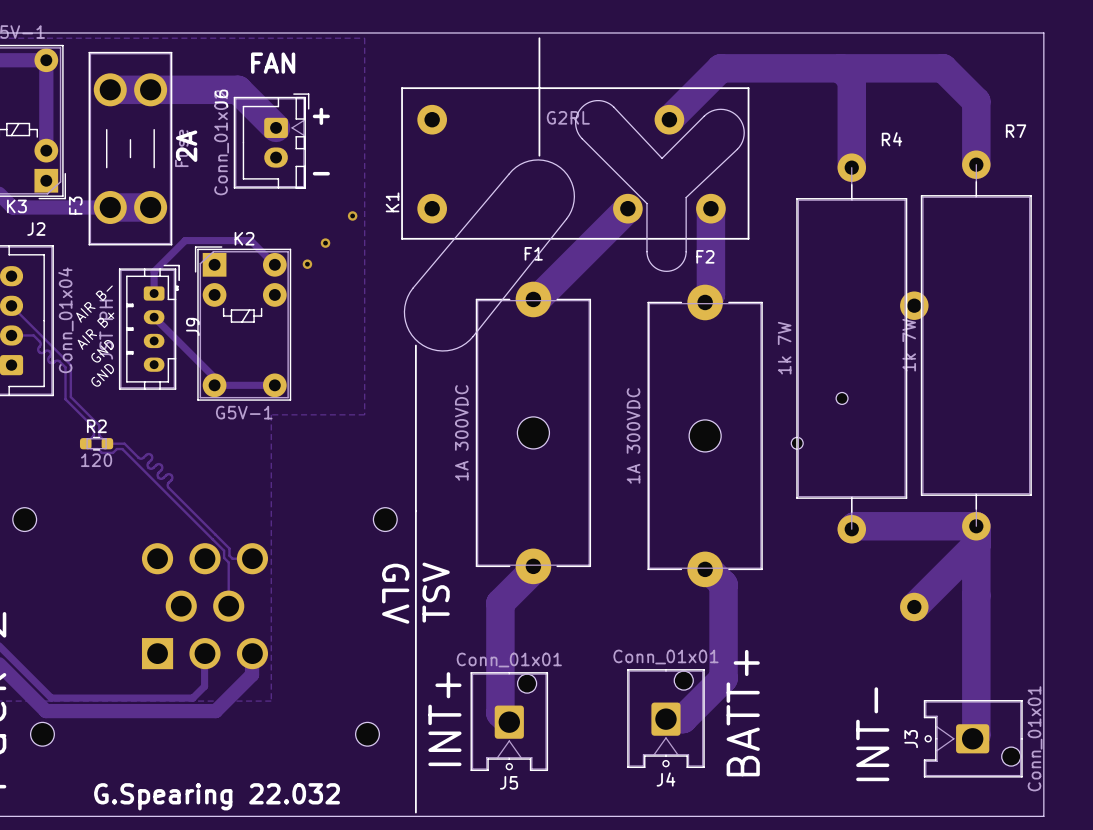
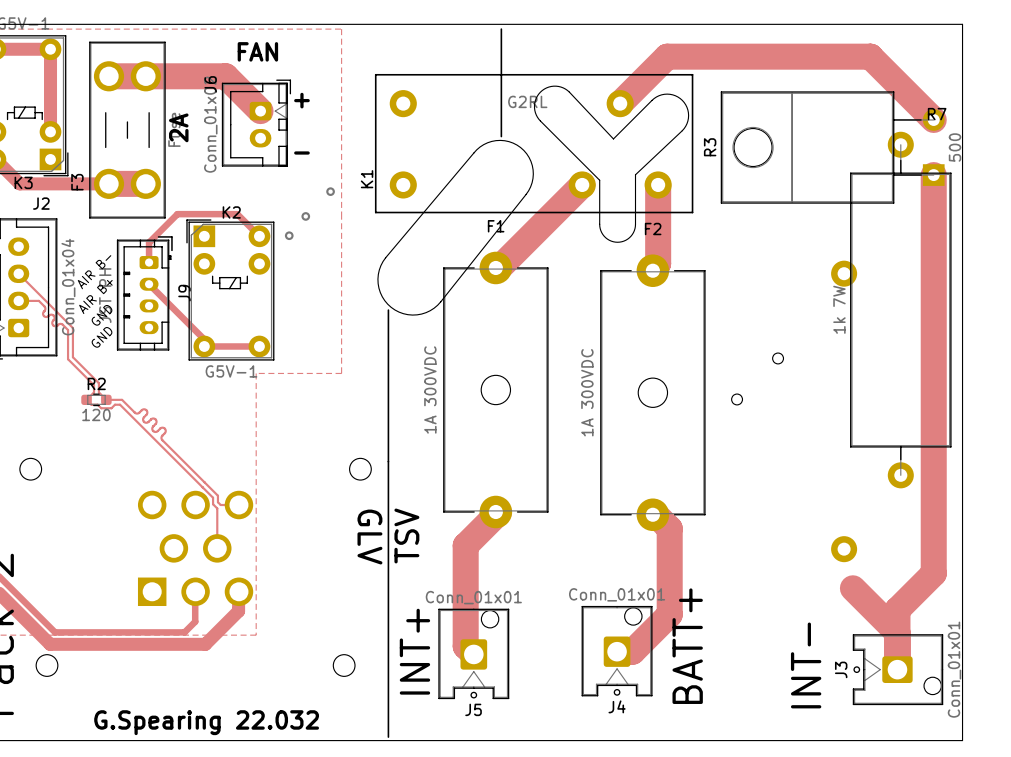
track: (840, 68) (851, 79) (851, 167) -> none
track: (943, 68) (976, 101) (976, 164) -> (870, 56) (933, 119)
R3: none -> 500 (832, 147)
R4: 1k 7W (851, 348) -> none
track: (851, 529) (854, 526) (976, 526) (976, 735) (972, 738) -> (933, 175) (933, 573) (897, 609) (897, 669)
track: (976, 544) (914, 607) -> none
track: none -> (852, 588) (897, 632)

